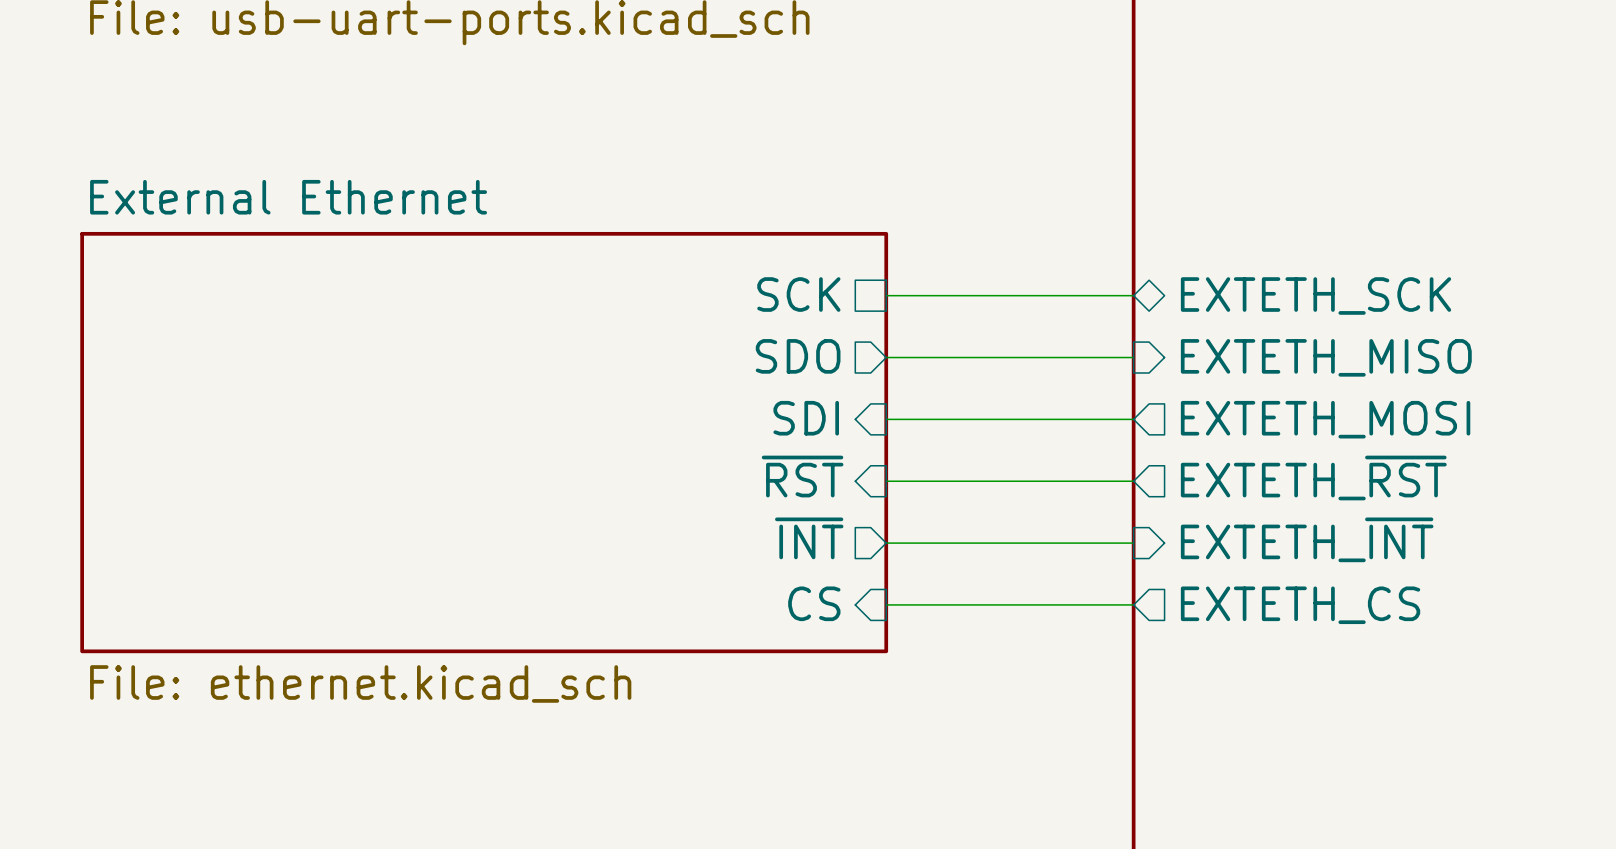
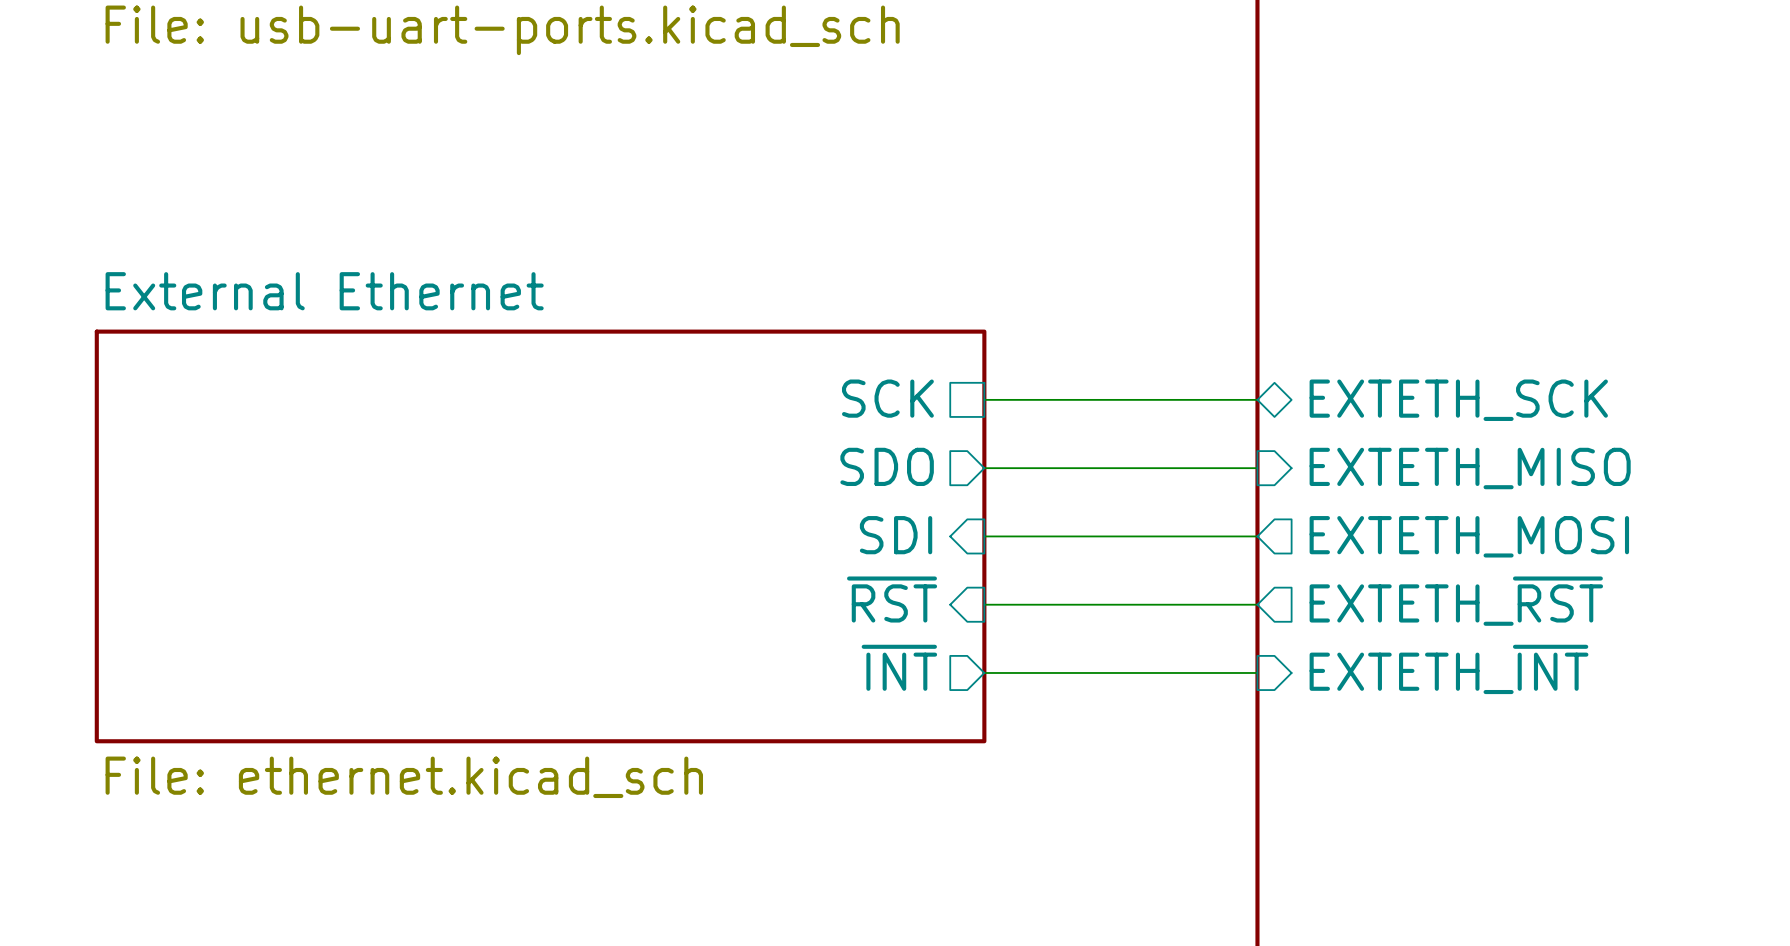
sheet pin: SCK (798, 294) -> none
wire: (886, 295) (1133, 295) -> none
sheet pin: EXTETH_SCK (1316, 295) -> none
sheet pin shape: output (798, 356) -> passive (887, 398)
sheet pin: SDO (798, 356) -> SCK (887, 398)
sheet pin shape: input (1326, 357) -> bidirectional (1458, 400)
sheet pin: EXTETH_MISO (1326, 357) -> EXTETH_SCK (1458, 400)
sheet pin shape: input (806, 418) -> output (887, 466)
sheet pin: SDI (806, 418) -> SDO (887, 466)
sheet pin shape: output (1325, 419) -> input (1470, 468)
sheet pin: EXTETH_MOSI (1325, 419) -> EXTETH_MISO (1470, 468)
sheet External Ethernet: File: ethernet.kicad_sch (484, 442) -> none
sheet pin: ~{RST} (802, 476) -> SDI (896, 535)
sheet pin: EXTETH_~{RST} (1313, 477) -> EXTETH_MOSI (1469, 536)
sheet External Ethernet: none -> File: ethernet.kicad_sch (540, 536)
sheet pin shape: output (809, 538) -> input (892, 599)
sheet pin: ~{INT} (809, 538) -> ~{RST} (892, 599)
sheet pin shape: input (1307, 539) -> output (1456, 601)
sheet pin: EXTETH_~{INT} (1307, 539) -> EXTETH_~{RST} (1456, 601)
sheet pin shape: input (814, 603) -> output (899, 667)
sheet pin: CS (814, 603) -> ~{INT} (899, 667)
sheet pin shape: output (1300, 605) -> input (1449, 669)
sheet pin: EXTETH_CS (1300, 605) -> EXTETH_~{INT} (1449, 669)

